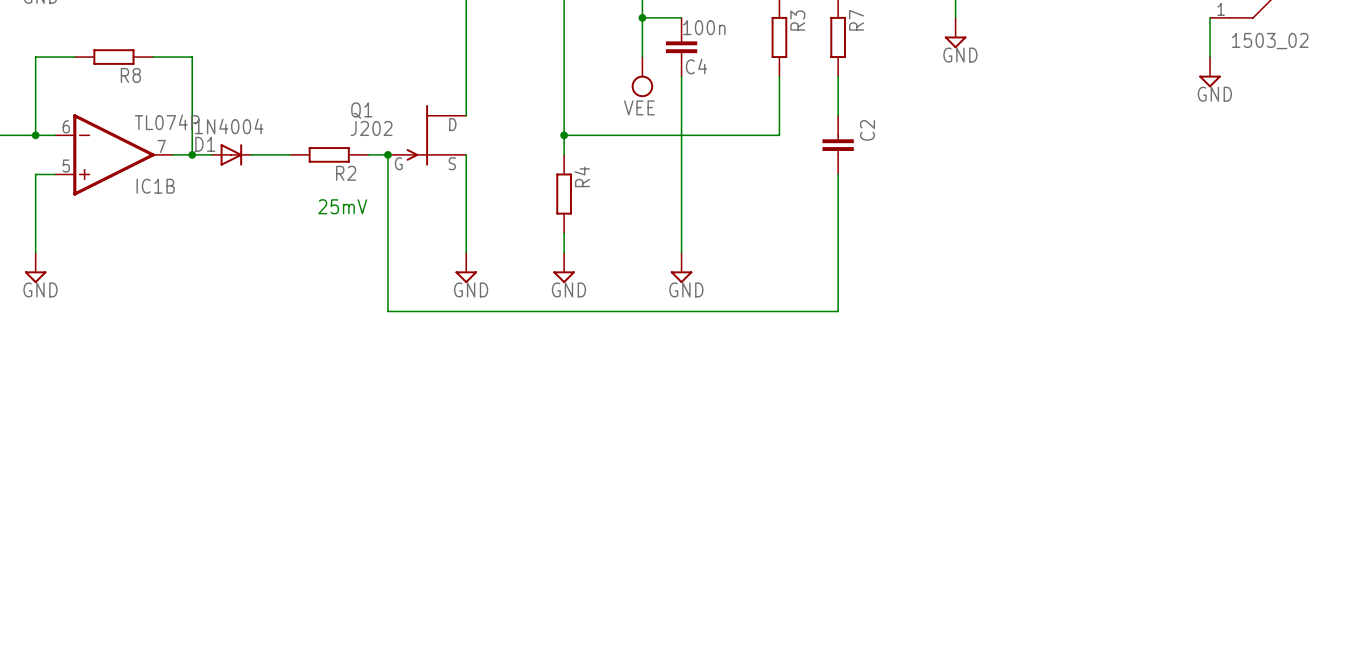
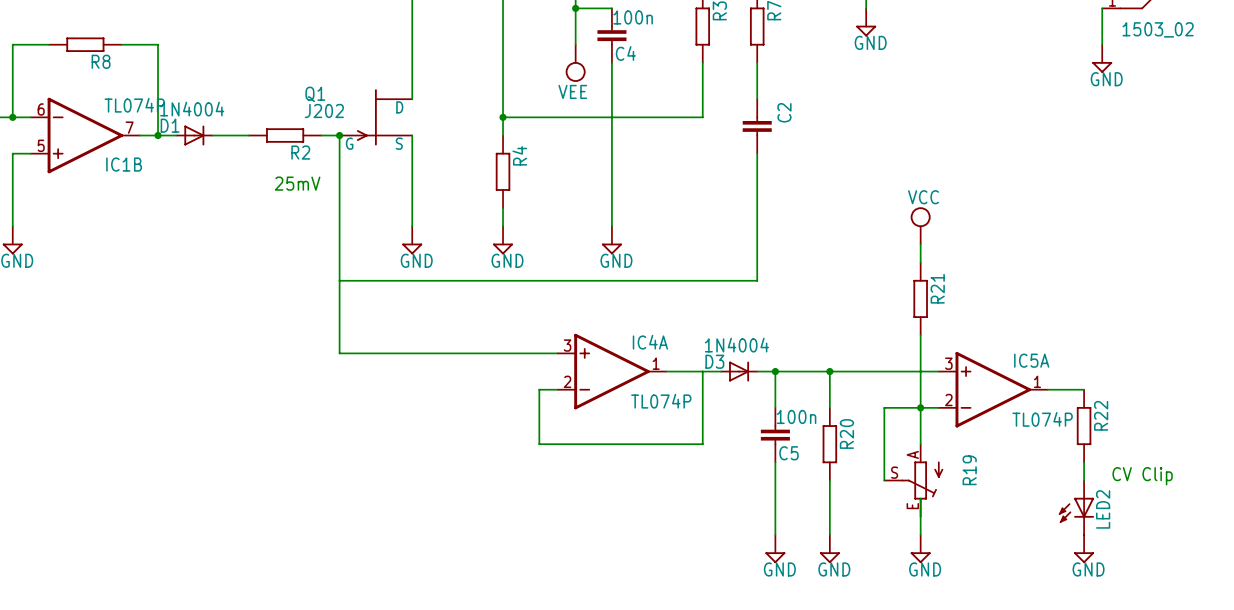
power symbol: none -> VCC (920, 225)
wire: none -> (920, 244) (920, 262)
wire: none -> (339, 280) (339, 353) (557, 353)
R21: none -> (920, 298)
wire: none -> (920, 335) (920, 444)
IC4A: none -> TL074P (611, 371)
wire: none -> (666, 371) (720, 371)
wire: none -> (702, 371) (702, 444) (539, 444) (539, 389) (557, 389)
D3: none -> 1N4004 (739, 371)
wire: none -> (757, 371) (938, 371)
wire: none -> (775, 371) (775, 407)
junction: none -> (775, 371)
wire: none -> (829, 371) (829, 407)
junction: none -> (829, 371)
IC5A: none -> TL074P (993, 389)
wire: none -> (1047, 389) (1084, 389)
junction: none -> (920, 407)
wire: none -> (938, 407) (884, 407) (884, 480)
R22: none -> (1084, 426)
C5: none -> 100n (775, 435)
R20: none -> (829, 444)
wire: none -> (775, 462) (775, 534)
wire: none -> (1084, 462) (1084, 480)
text: none -> CV Clip (1142, 476)
wire: none -> (829, 480) (829, 534)
R19: none -> (913, 480)
wire: none -> (920, 498) (920, 534)
LED2: none -> (1076, 507)
power symbol: none -> GND (775, 549)
power symbol: none -> GND (829, 549)
power symbol: none -> GND (920, 549)
power symbol: none -> GND (1084, 549)

